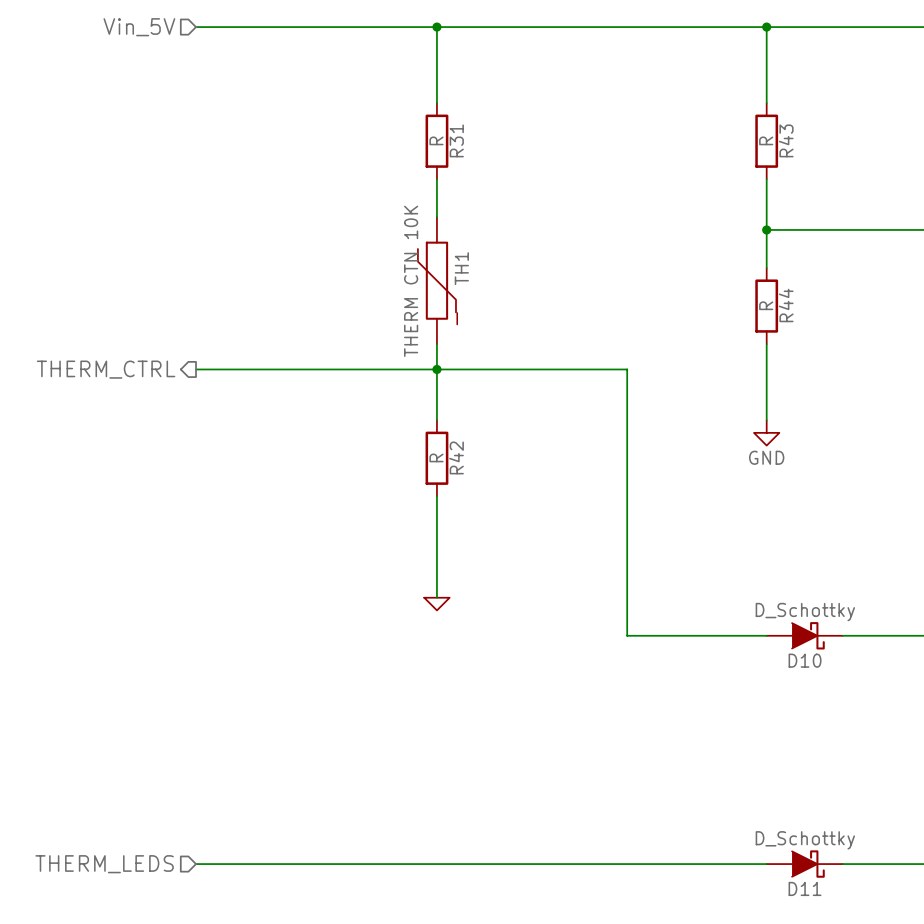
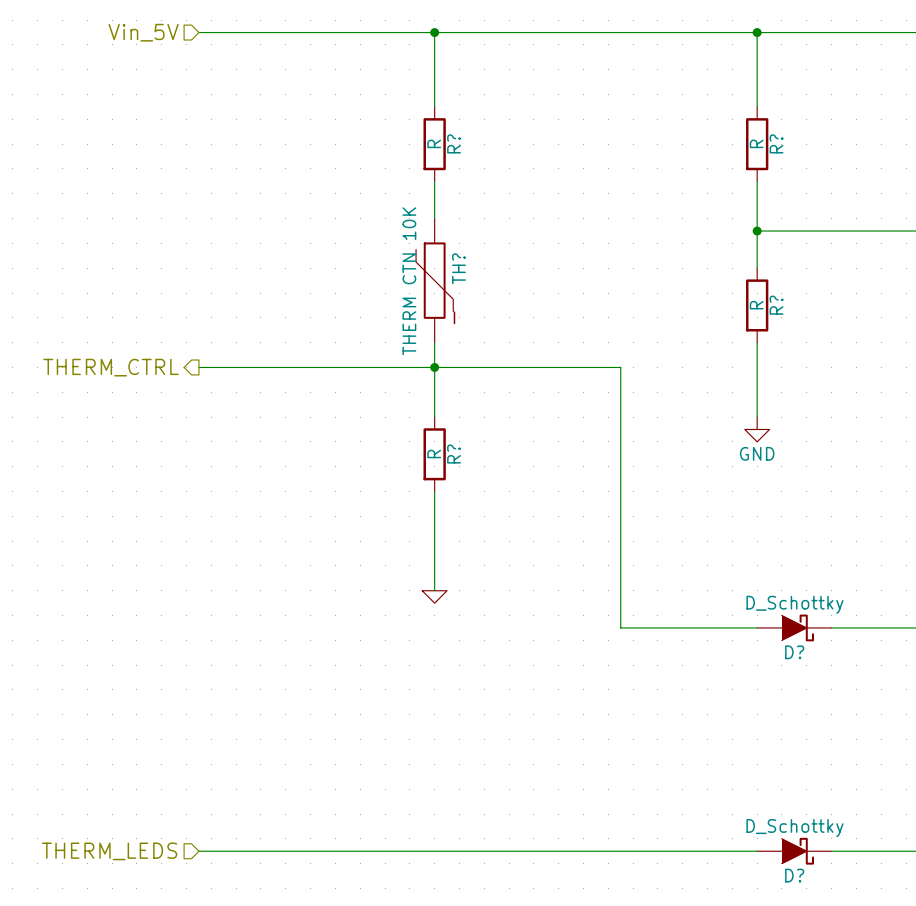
R31 name: R31 (456, 140) -> R? (454, 143)
R43 name: R43 (786, 140) -> R? (776, 143)
TH1 name: TH1 (461, 268) -> TH? (459, 268)
R44 name: R44 (786, 305) -> R? (776, 305)
R42 name: R42 (456, 457) -> R? (454, 454)
D10 name: D10 (805, 660) -> D? (794, 652)
D11 name: D11 (805, 888) -> D? (794, 875)

